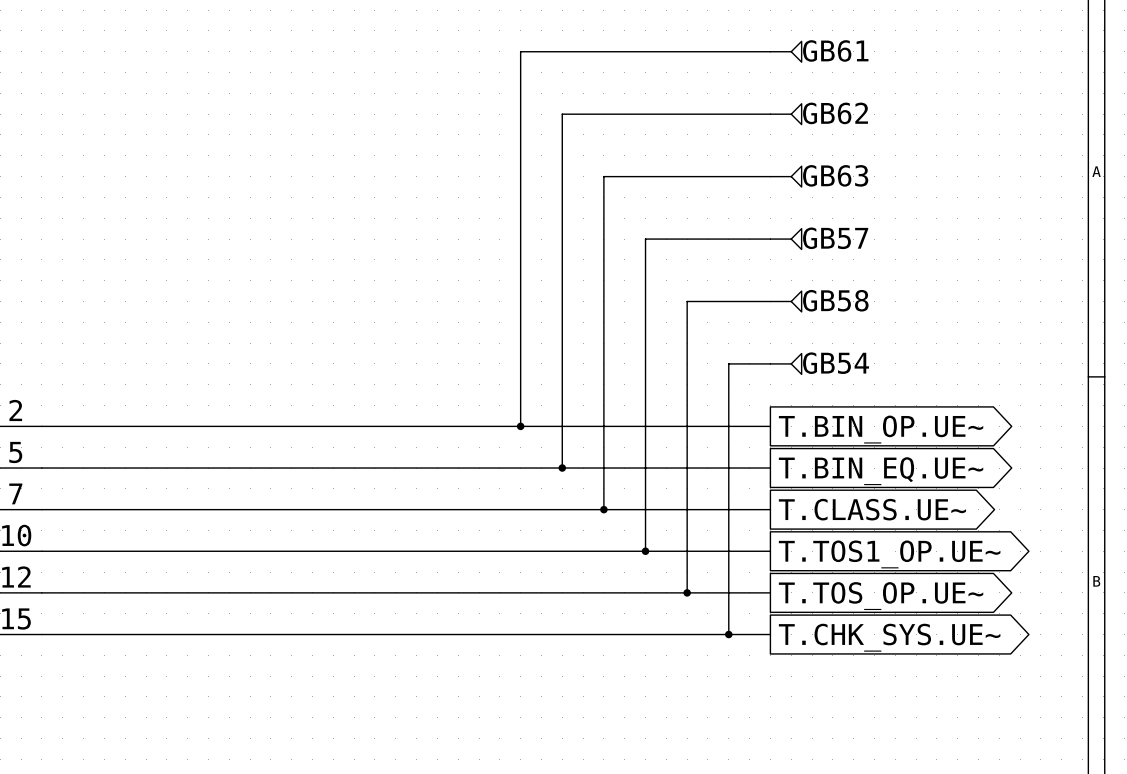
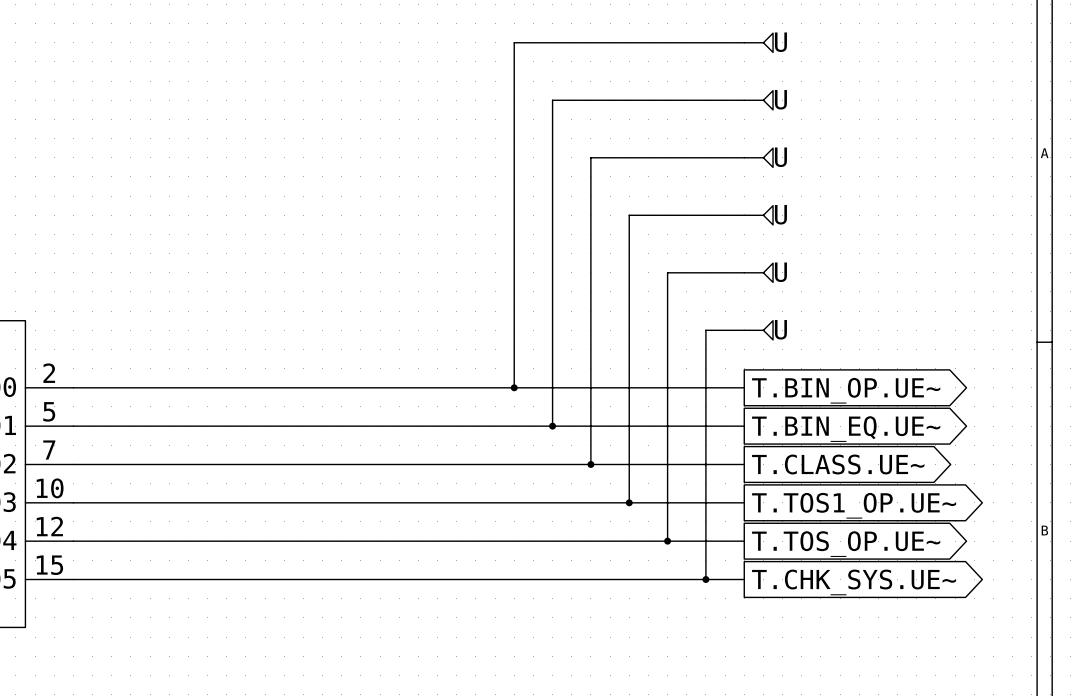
GB61 name: GB61 (835, 50) -> U (780, 42)
GB62 name: GB62 (835, 113) -> U (780, 99)
GB63 name: GB63 (835, 175) -> U (780, 157)
GB57 name: GB57 (835, 238) -> U (780, 214)
GB58 name: GB58 (835, 300) -> U (780, 272)
GB54 name: GB54 (836, 363) -> U (780, 329)

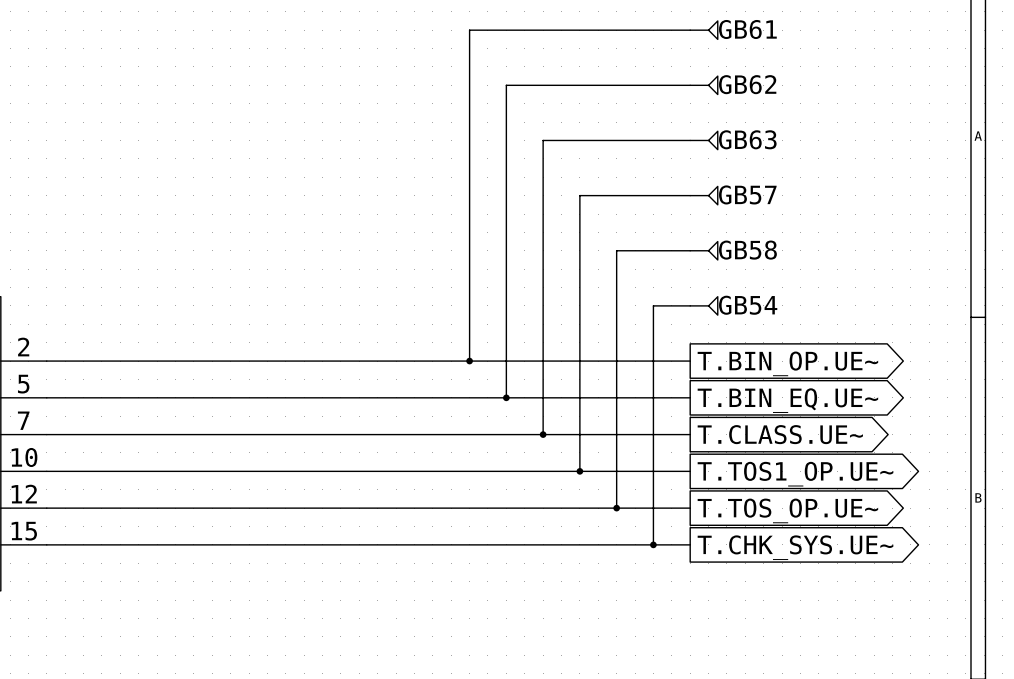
U name: U (780, 42) -> GB61 (747, 29)
U name: U (780, 99) -> GB62 (747, 84)
U name: U (780, 157) -> GB63 (747, 139)
U name: U (780, 214) -> GB57 (747, 194)
U name: U (780, 272) -> GB58 (747, 250)
U name: U (780, 329) -> GB54 (748, 305)

